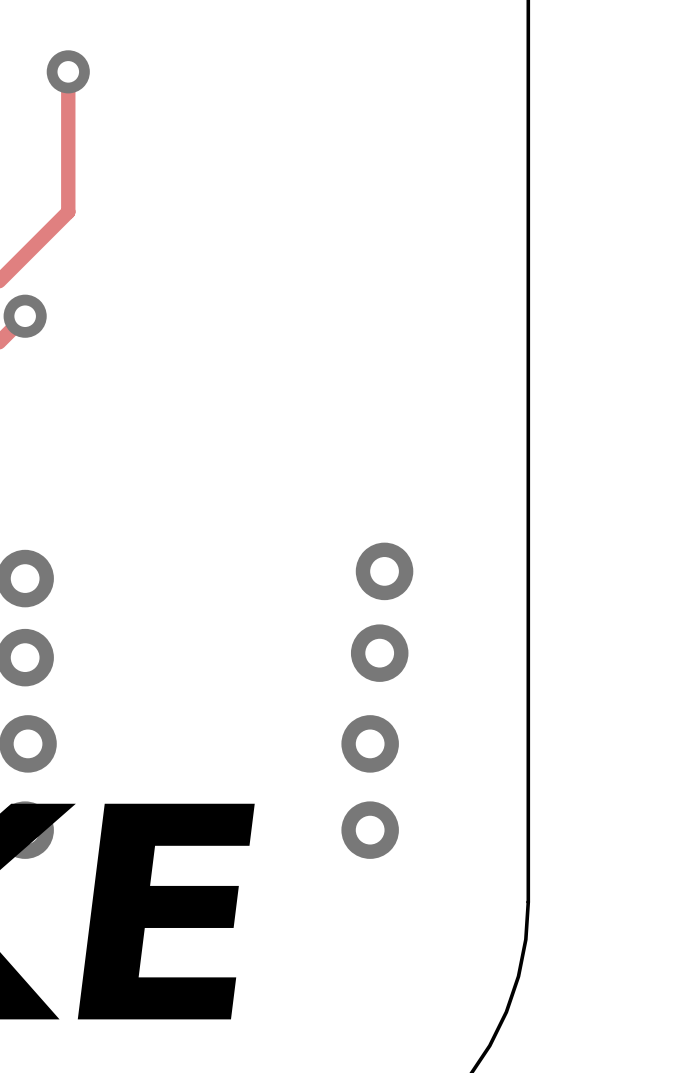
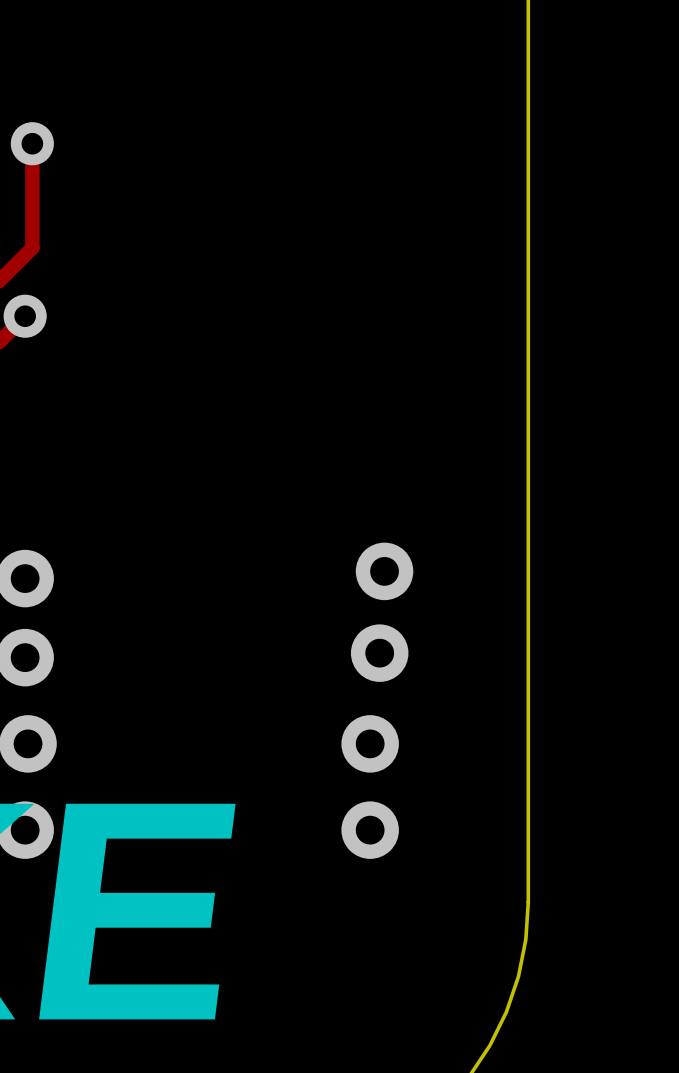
track: (68, 71) (68, 212) (32, 247) -> (32, 143) (32, 247)
via position: (68, 71) -> (32, 143)

